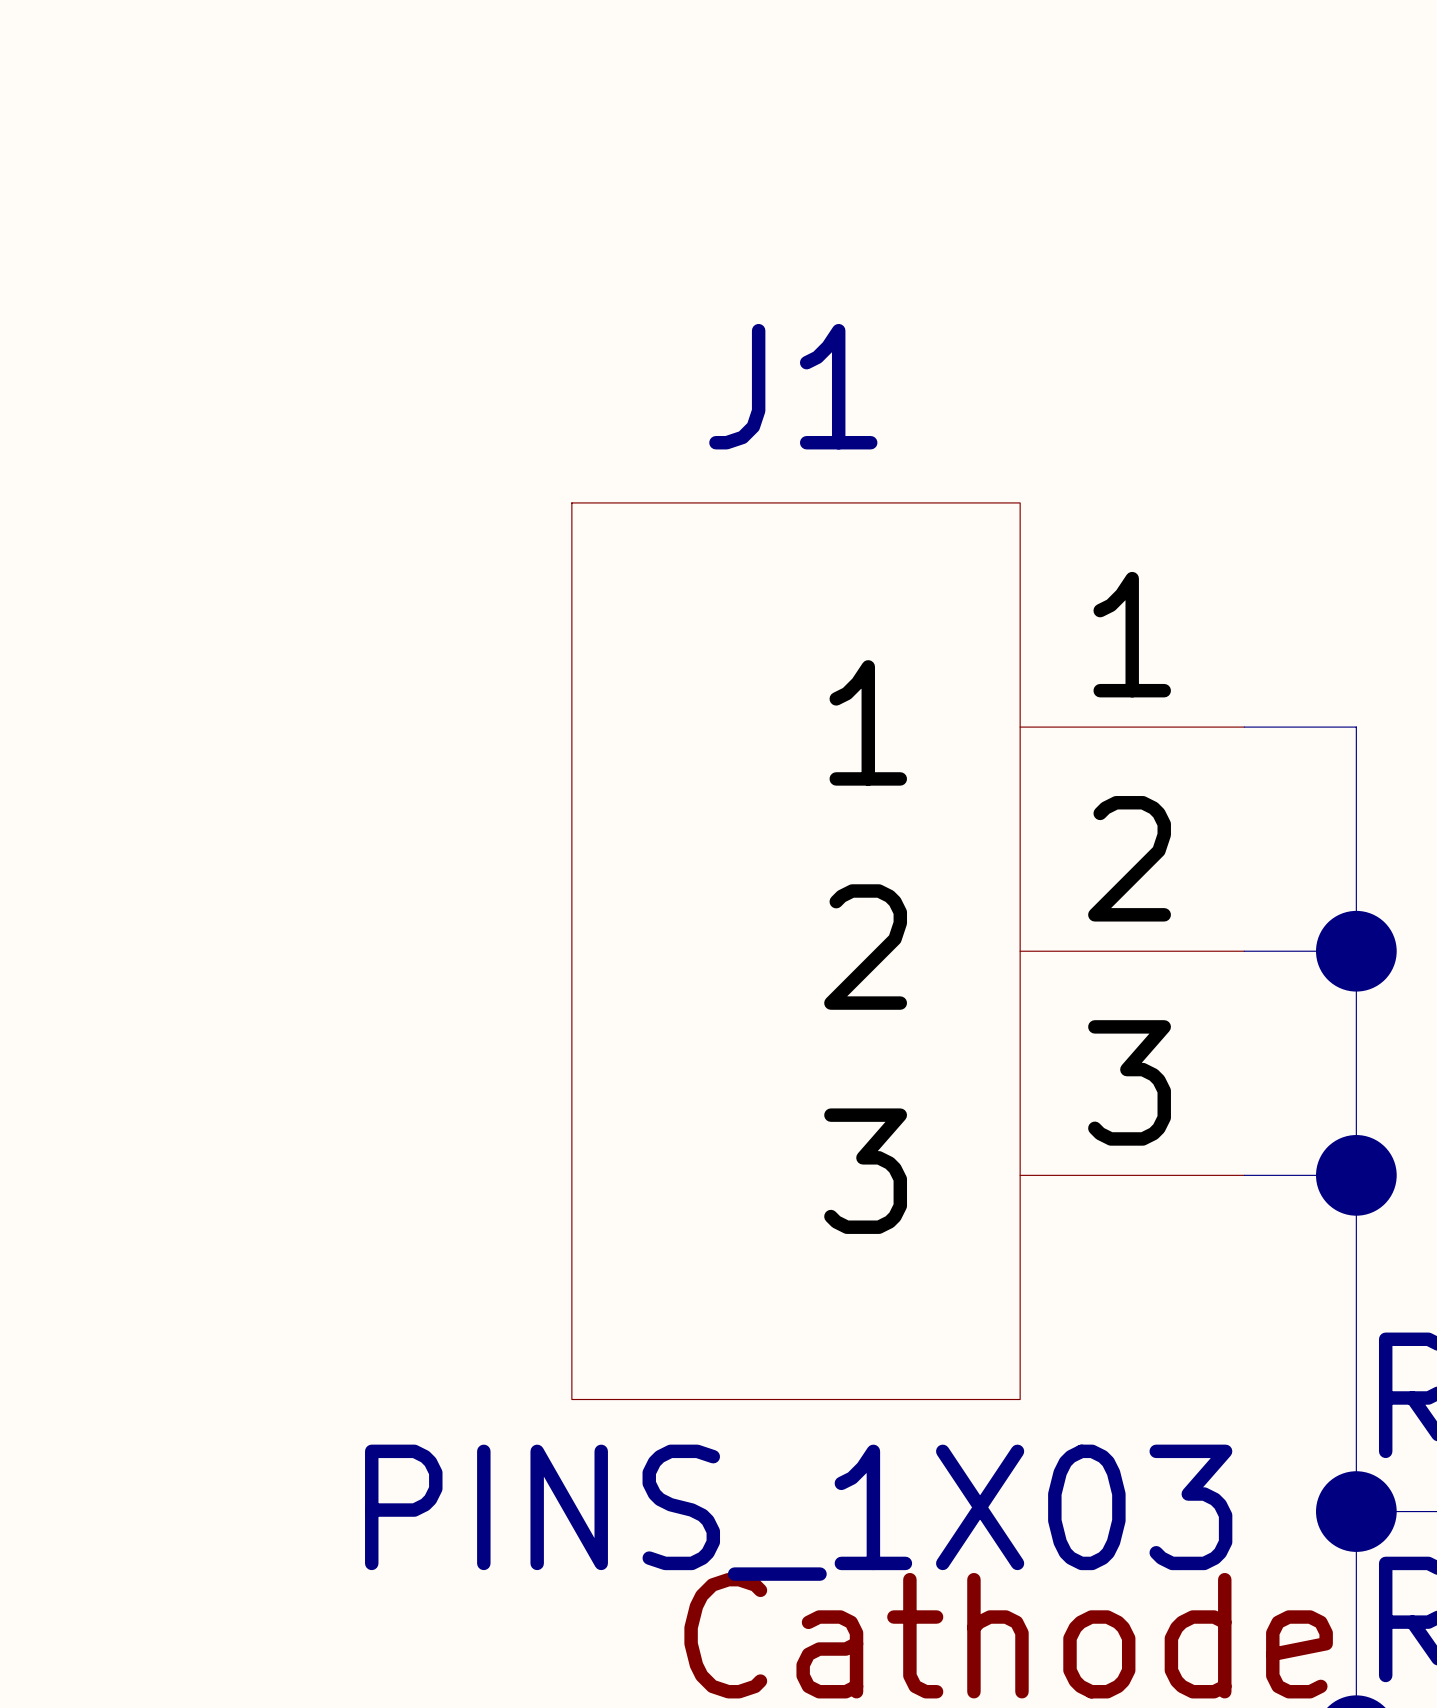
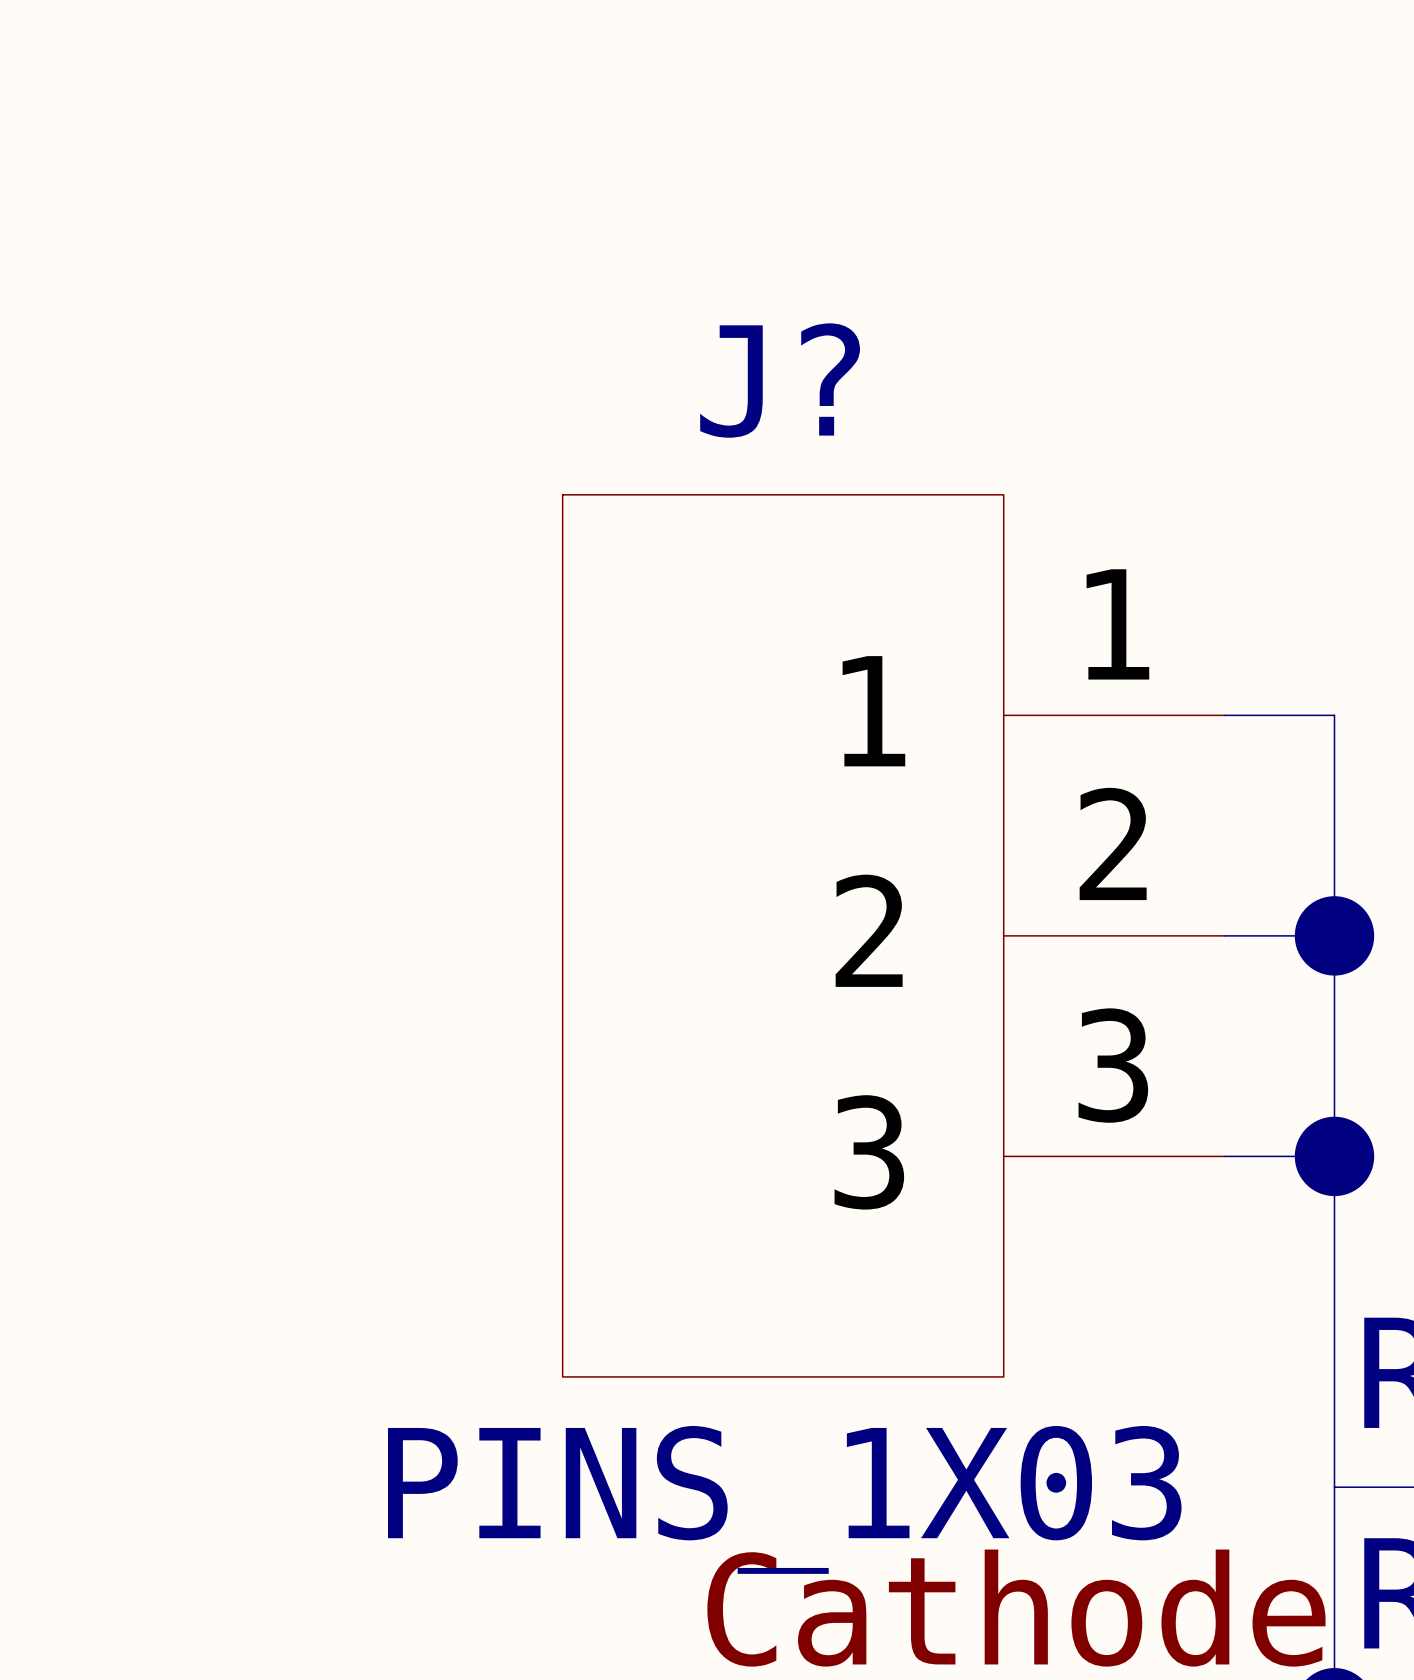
J1 name: J1 (793, 386) -> J? (780, 380)
junction: (1356, 1511) -> none

